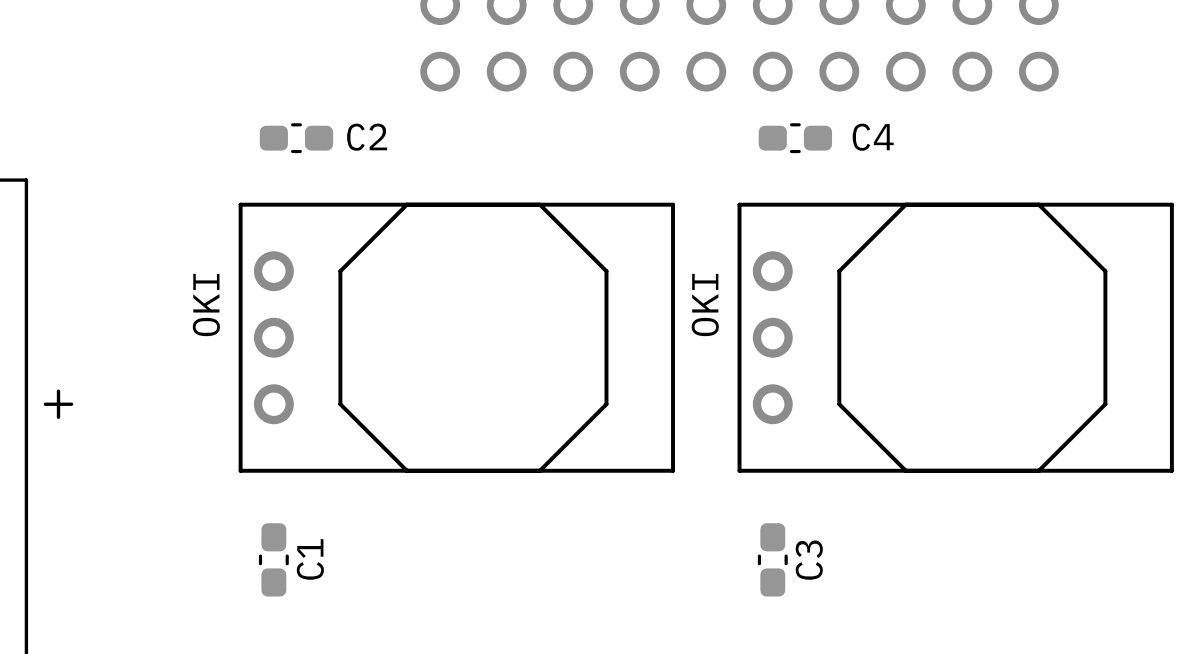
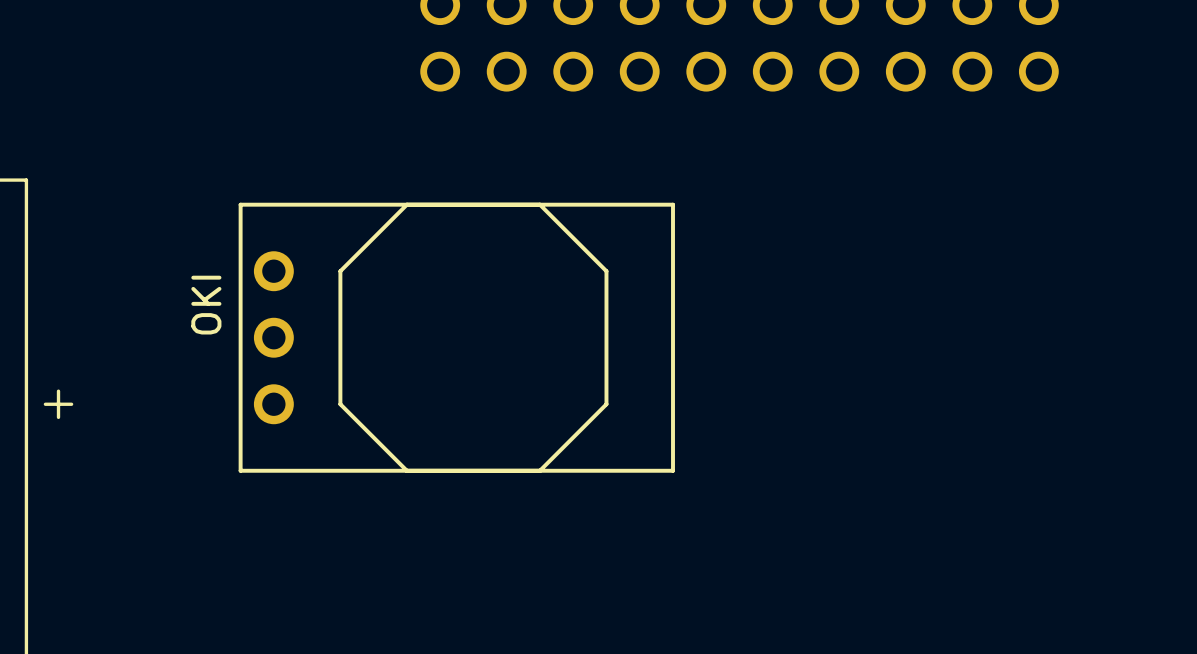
C2: (296, 138) -> none
C4: (795, 138) -> none
part: OKI (955, 337) -> none
C1: (273, 559) -> none
C3: (772, 559) -> none

